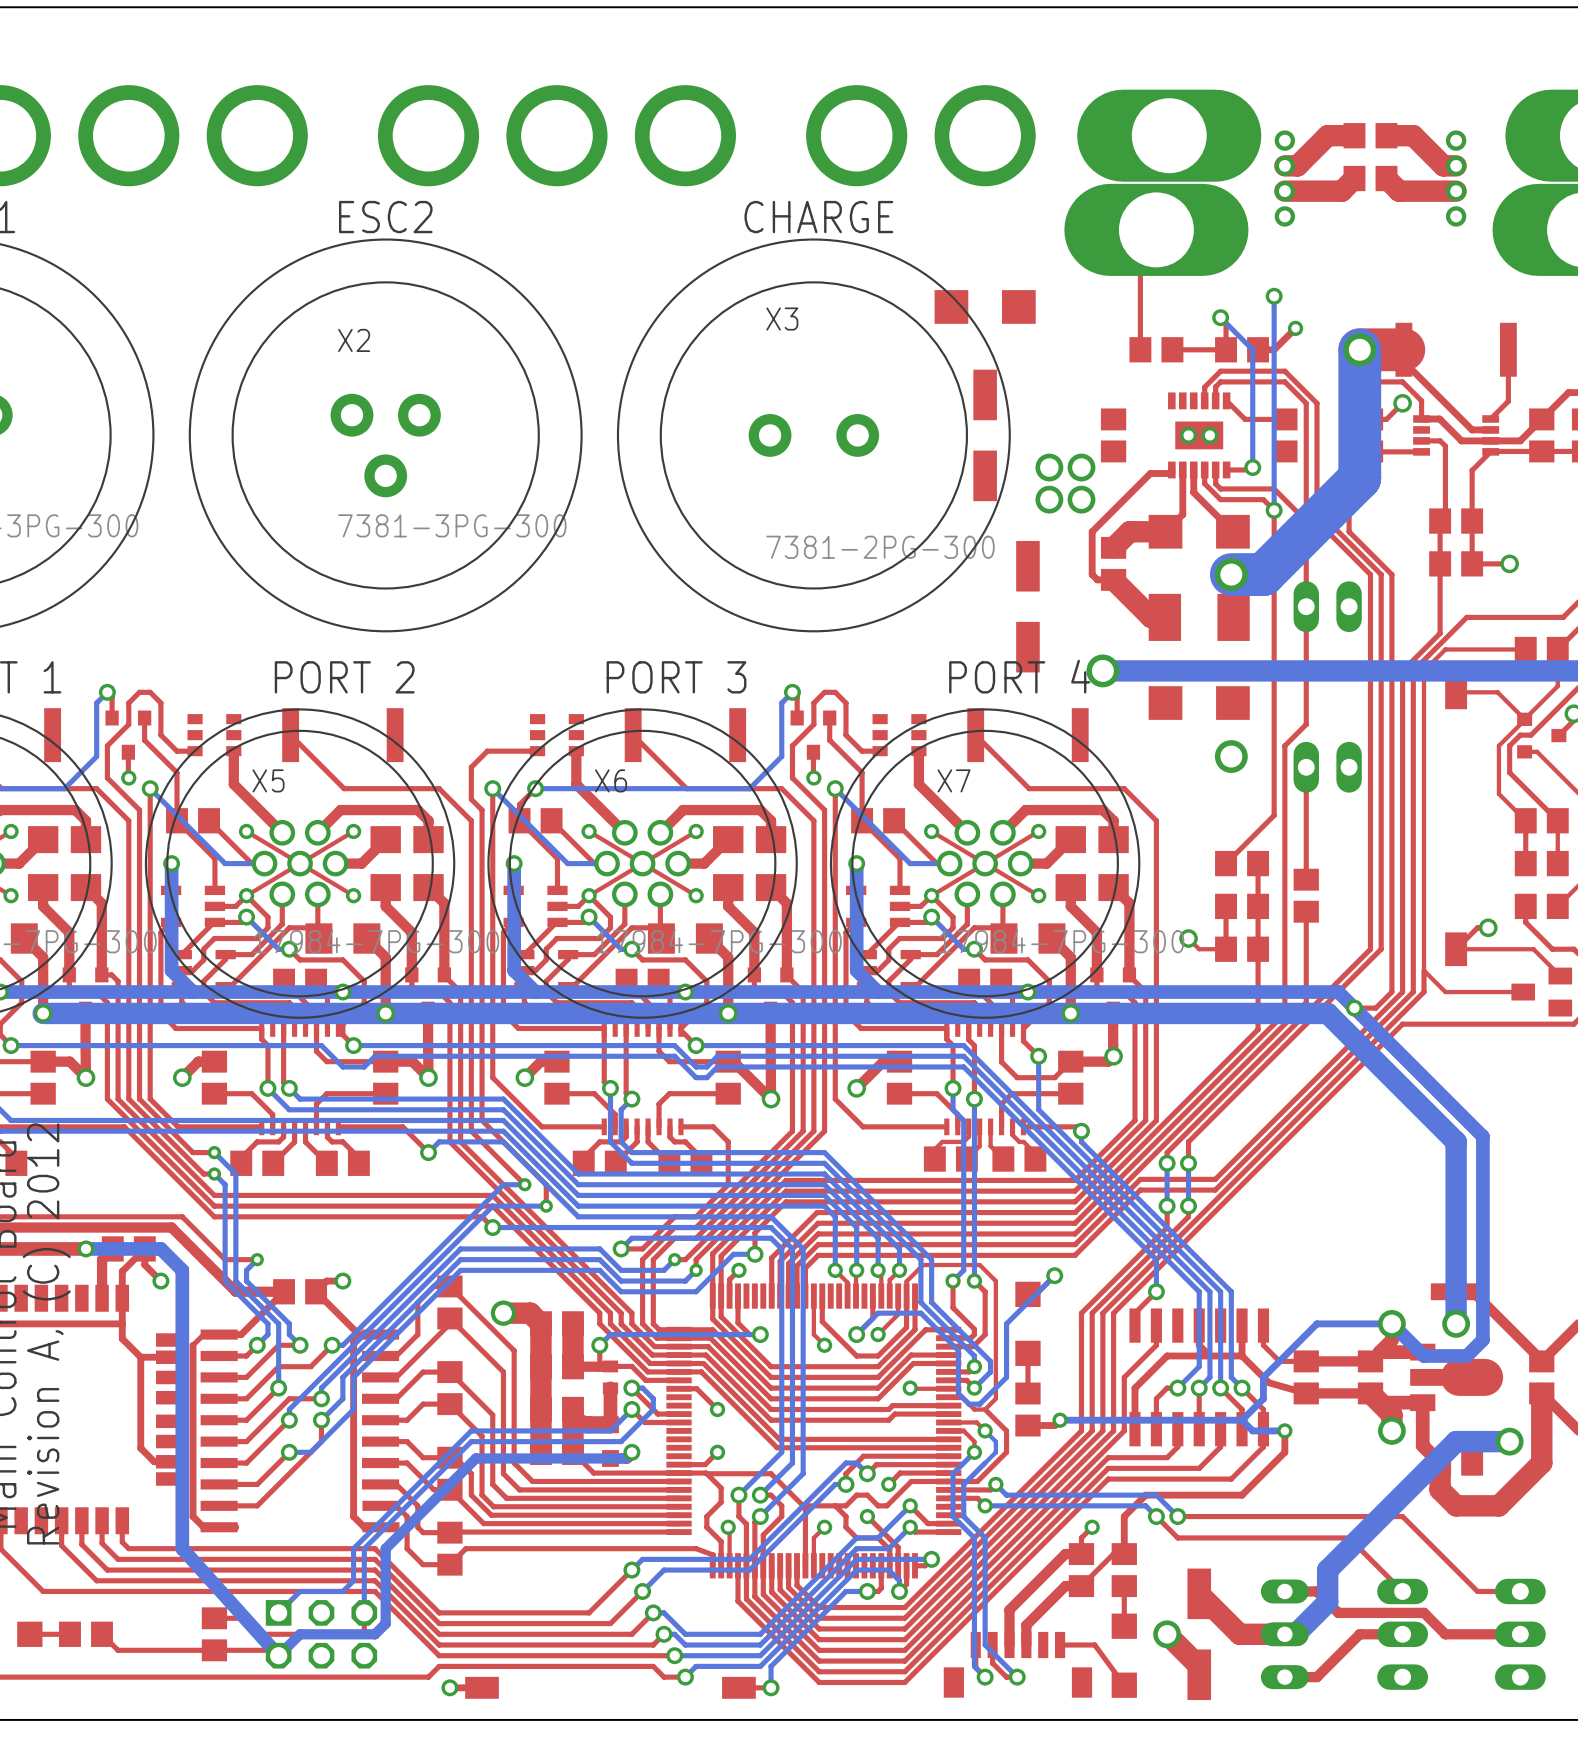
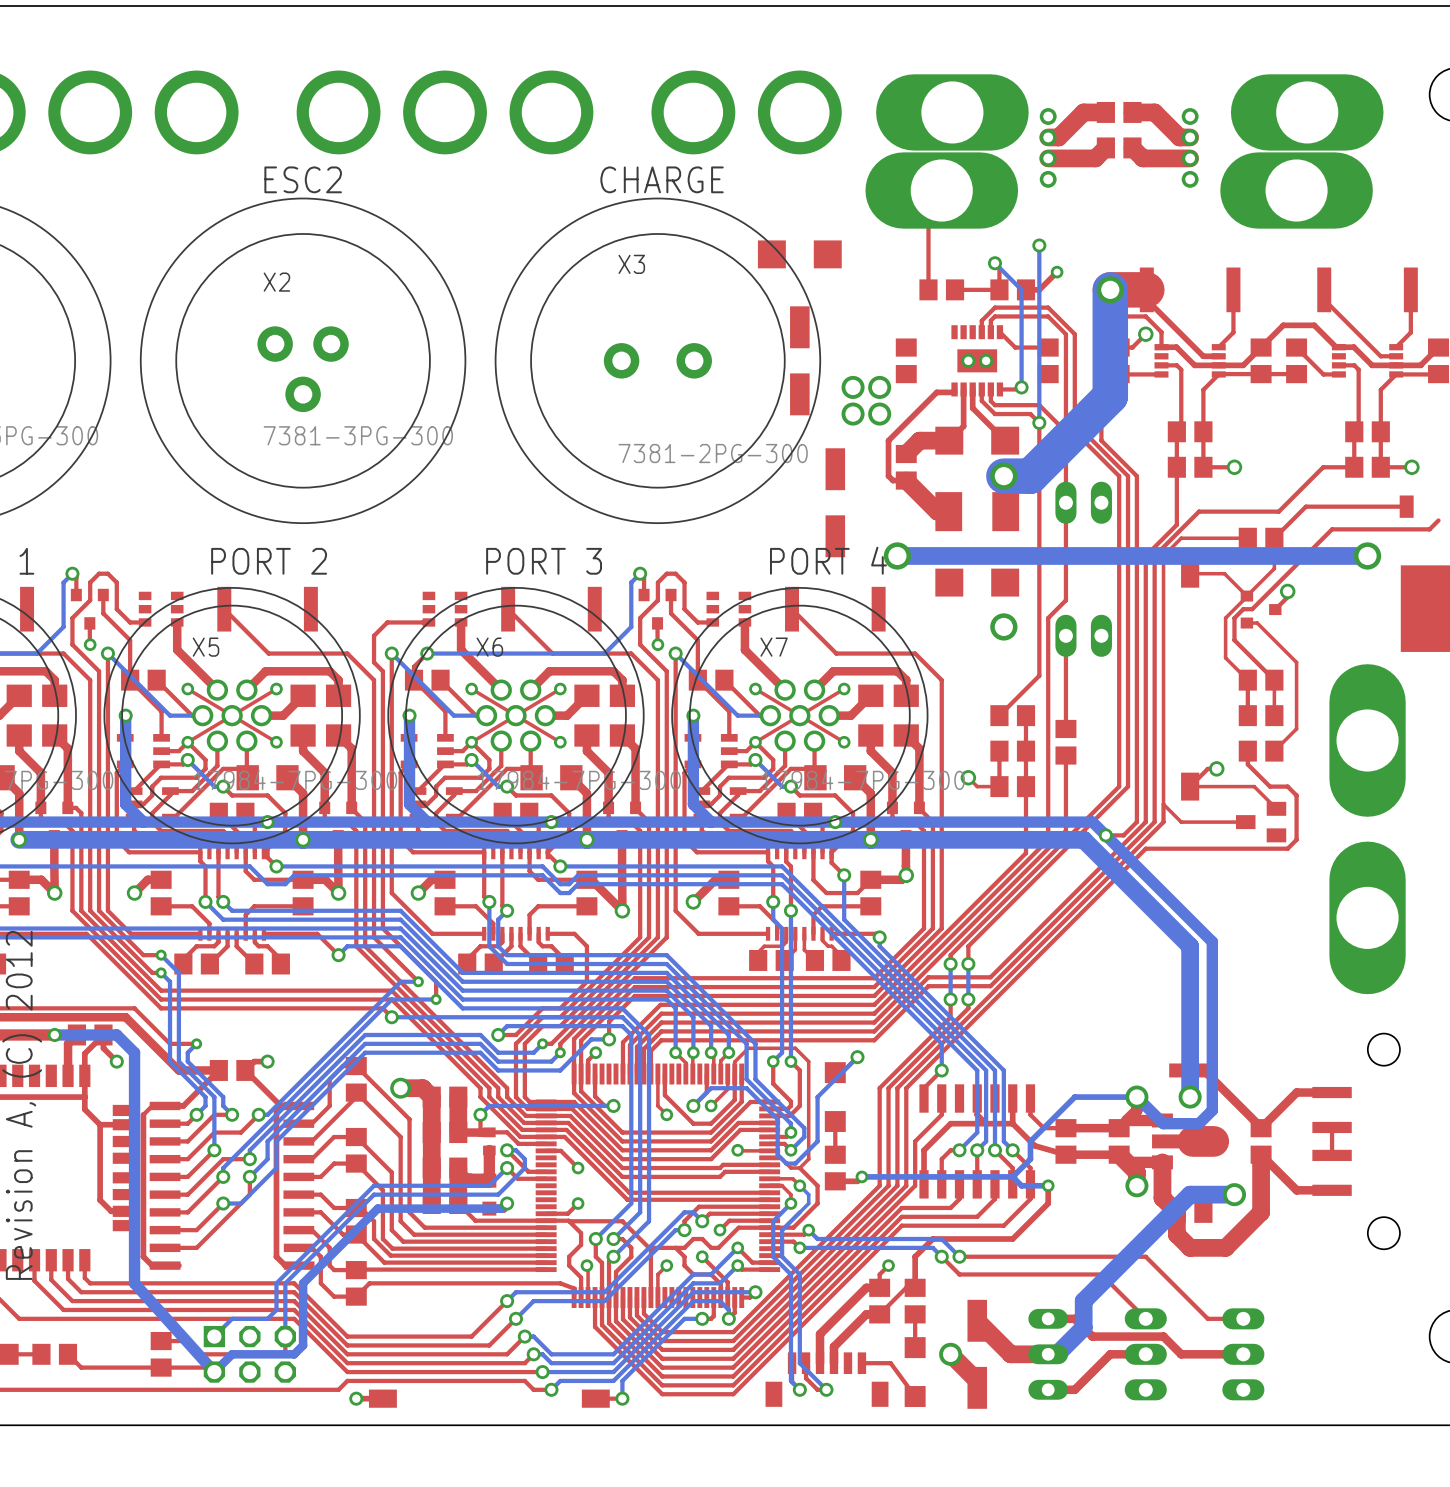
top track width: thin (1422, 1402) (1422, 1445) (1440, 1463) -> thick (1162, 1162) (1162, 1197) (1176, 1212)

